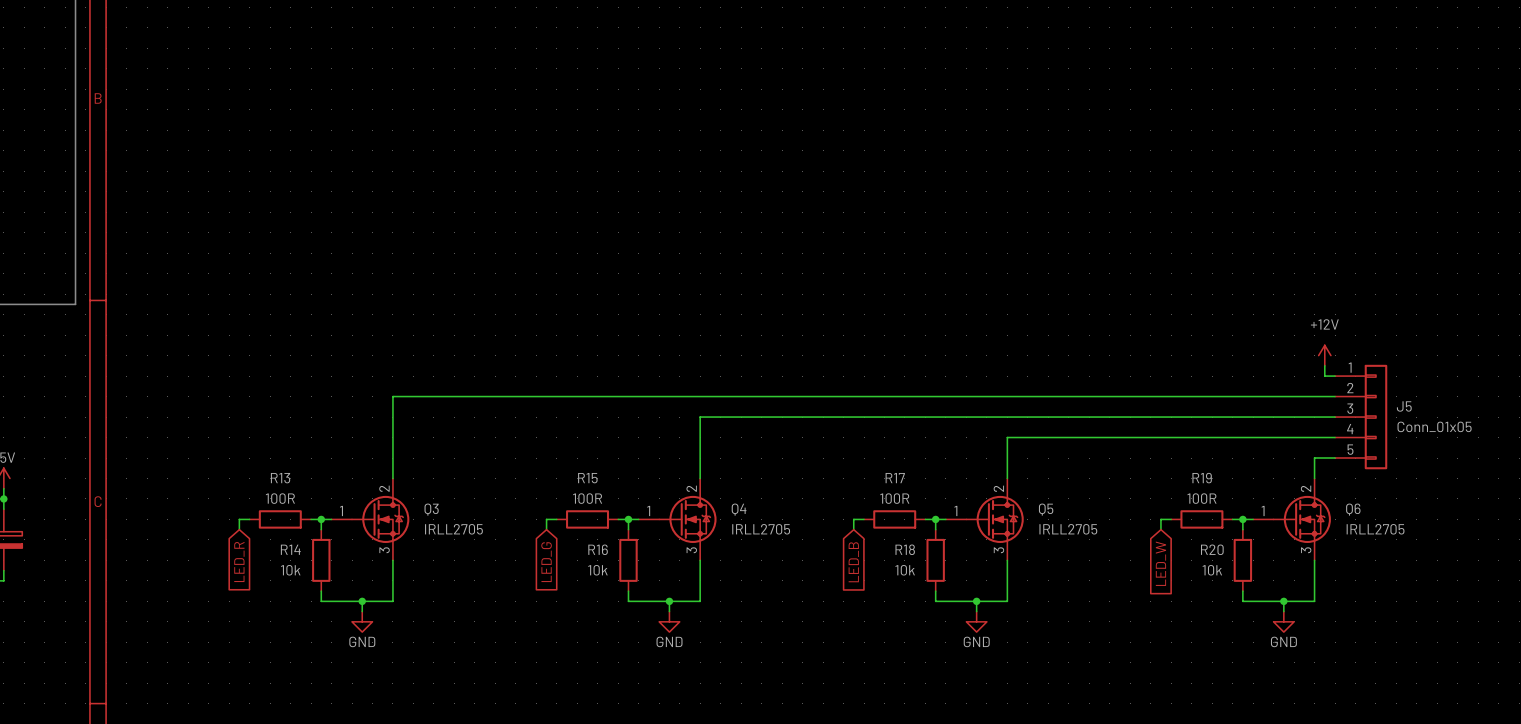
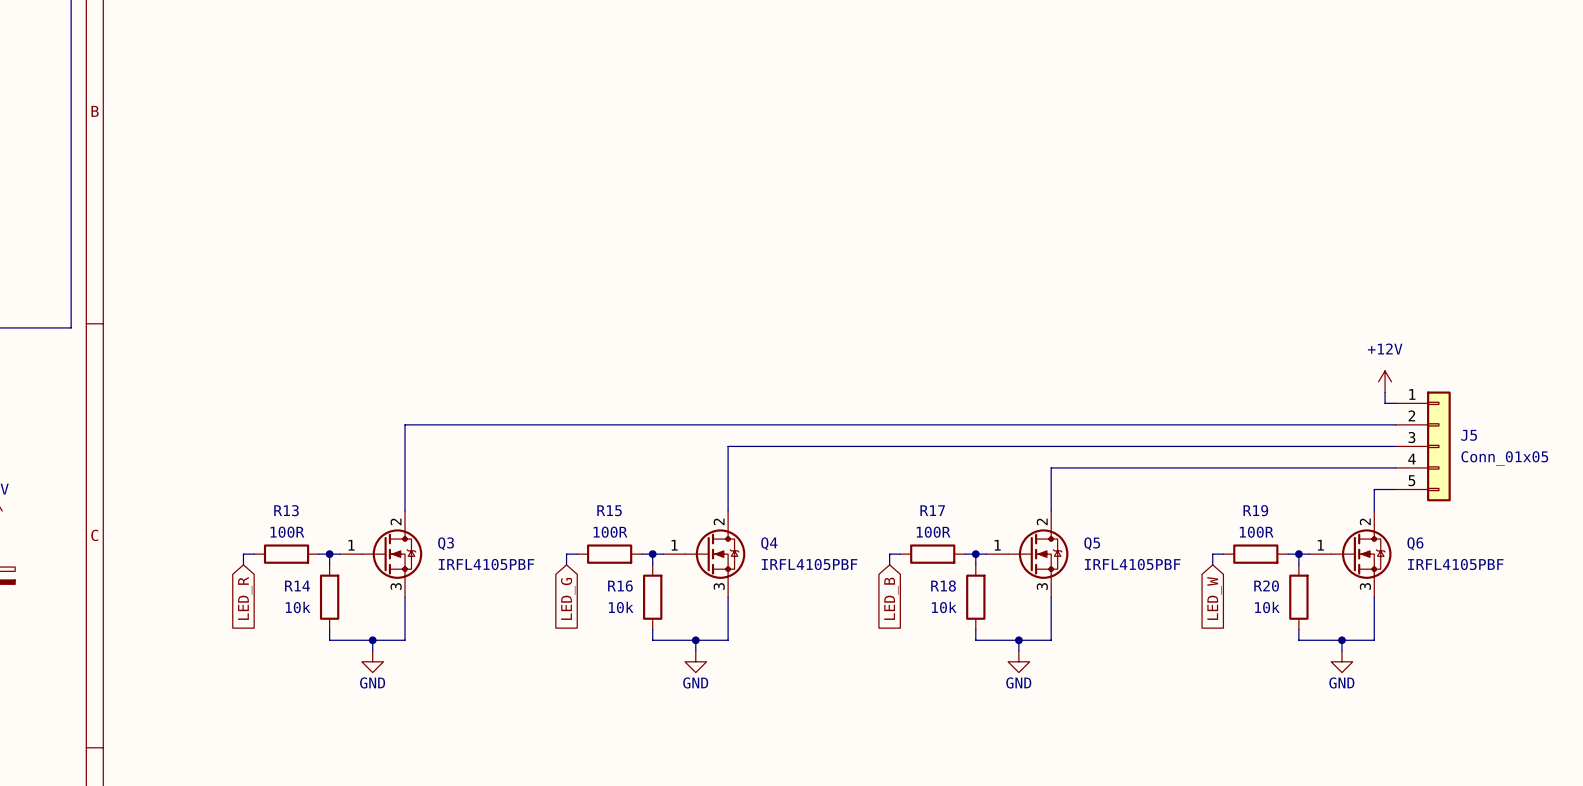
Q3 value: IRLL2705 (453, 529) -> IRFL4105PBF (486, 564)
Q4 value: IRLL2705 (761, 529) -> IRFL4105PBF (809, 564)
Q5 value: IRLL2705 (1068, 529) -> IRFL4105PBF (1132, 564)
Q6 value: IRLL2705 (1375, 529) -> IRFL4105PBF (1455, 564)

